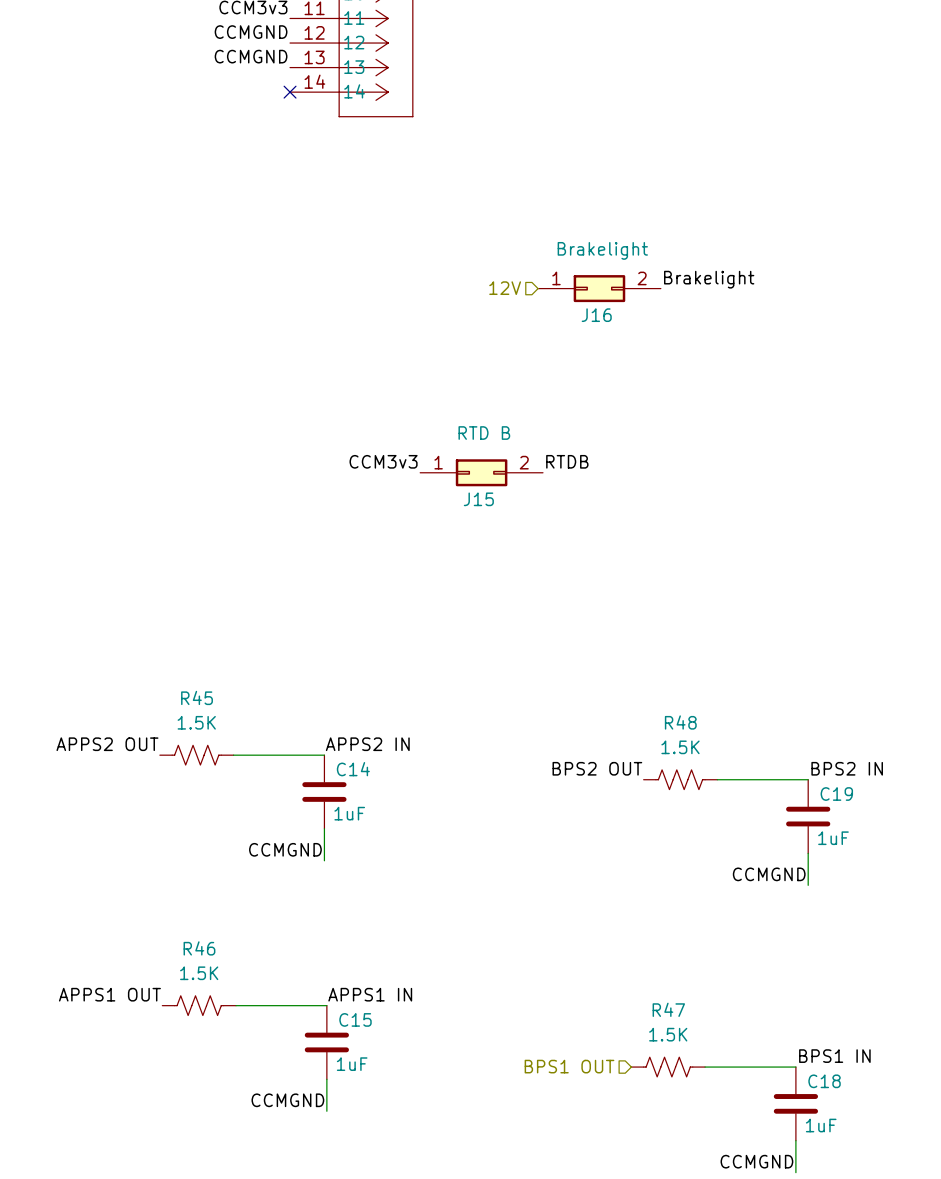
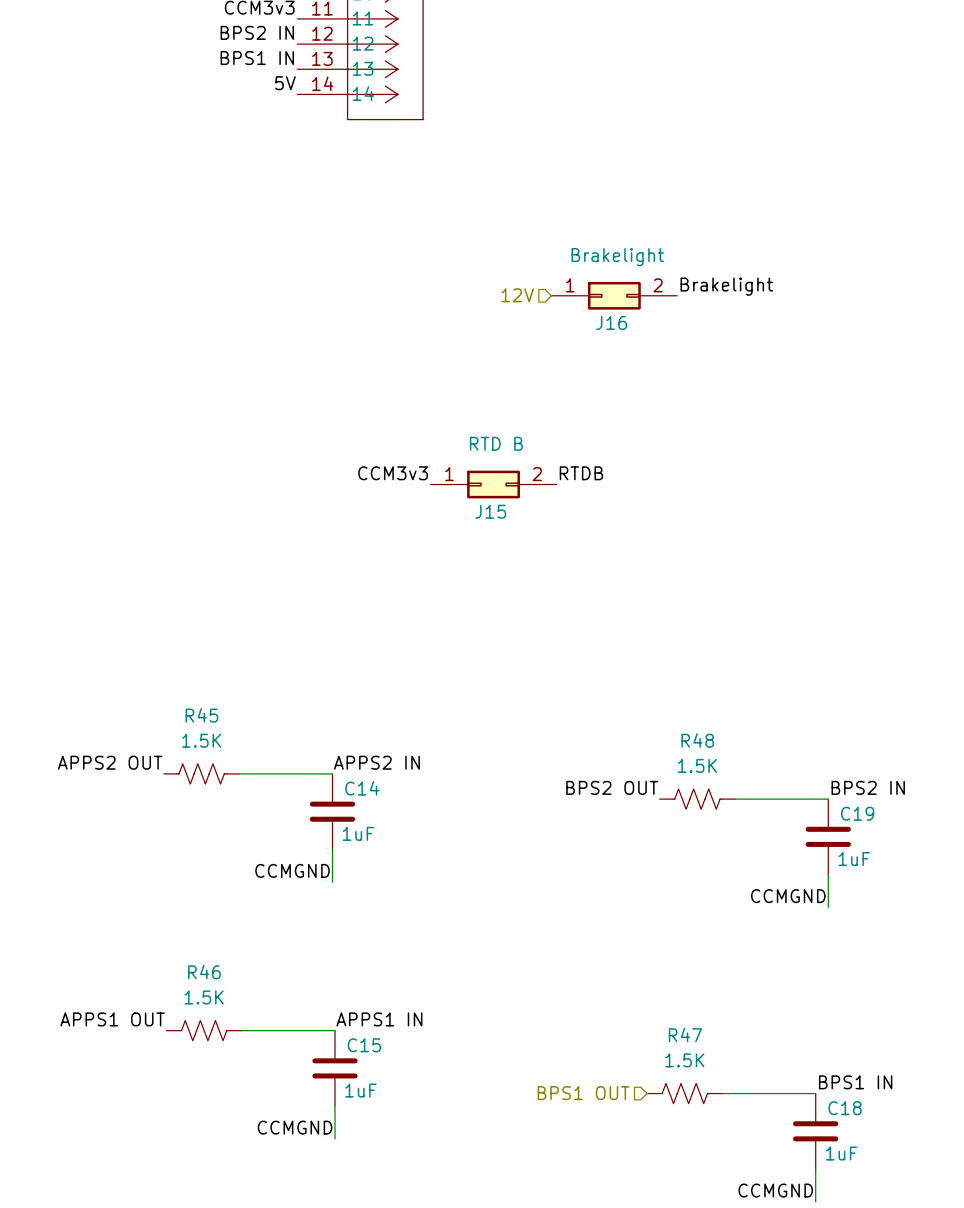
label: CCMGND (251, 32) -> BPS2 IN (257, 32)
label: CCMGND (251, 56) -> BPS1 IN (257, 58)
label: none -> 5V (285, 83)
no-connect mark: (290, 92) -> none

